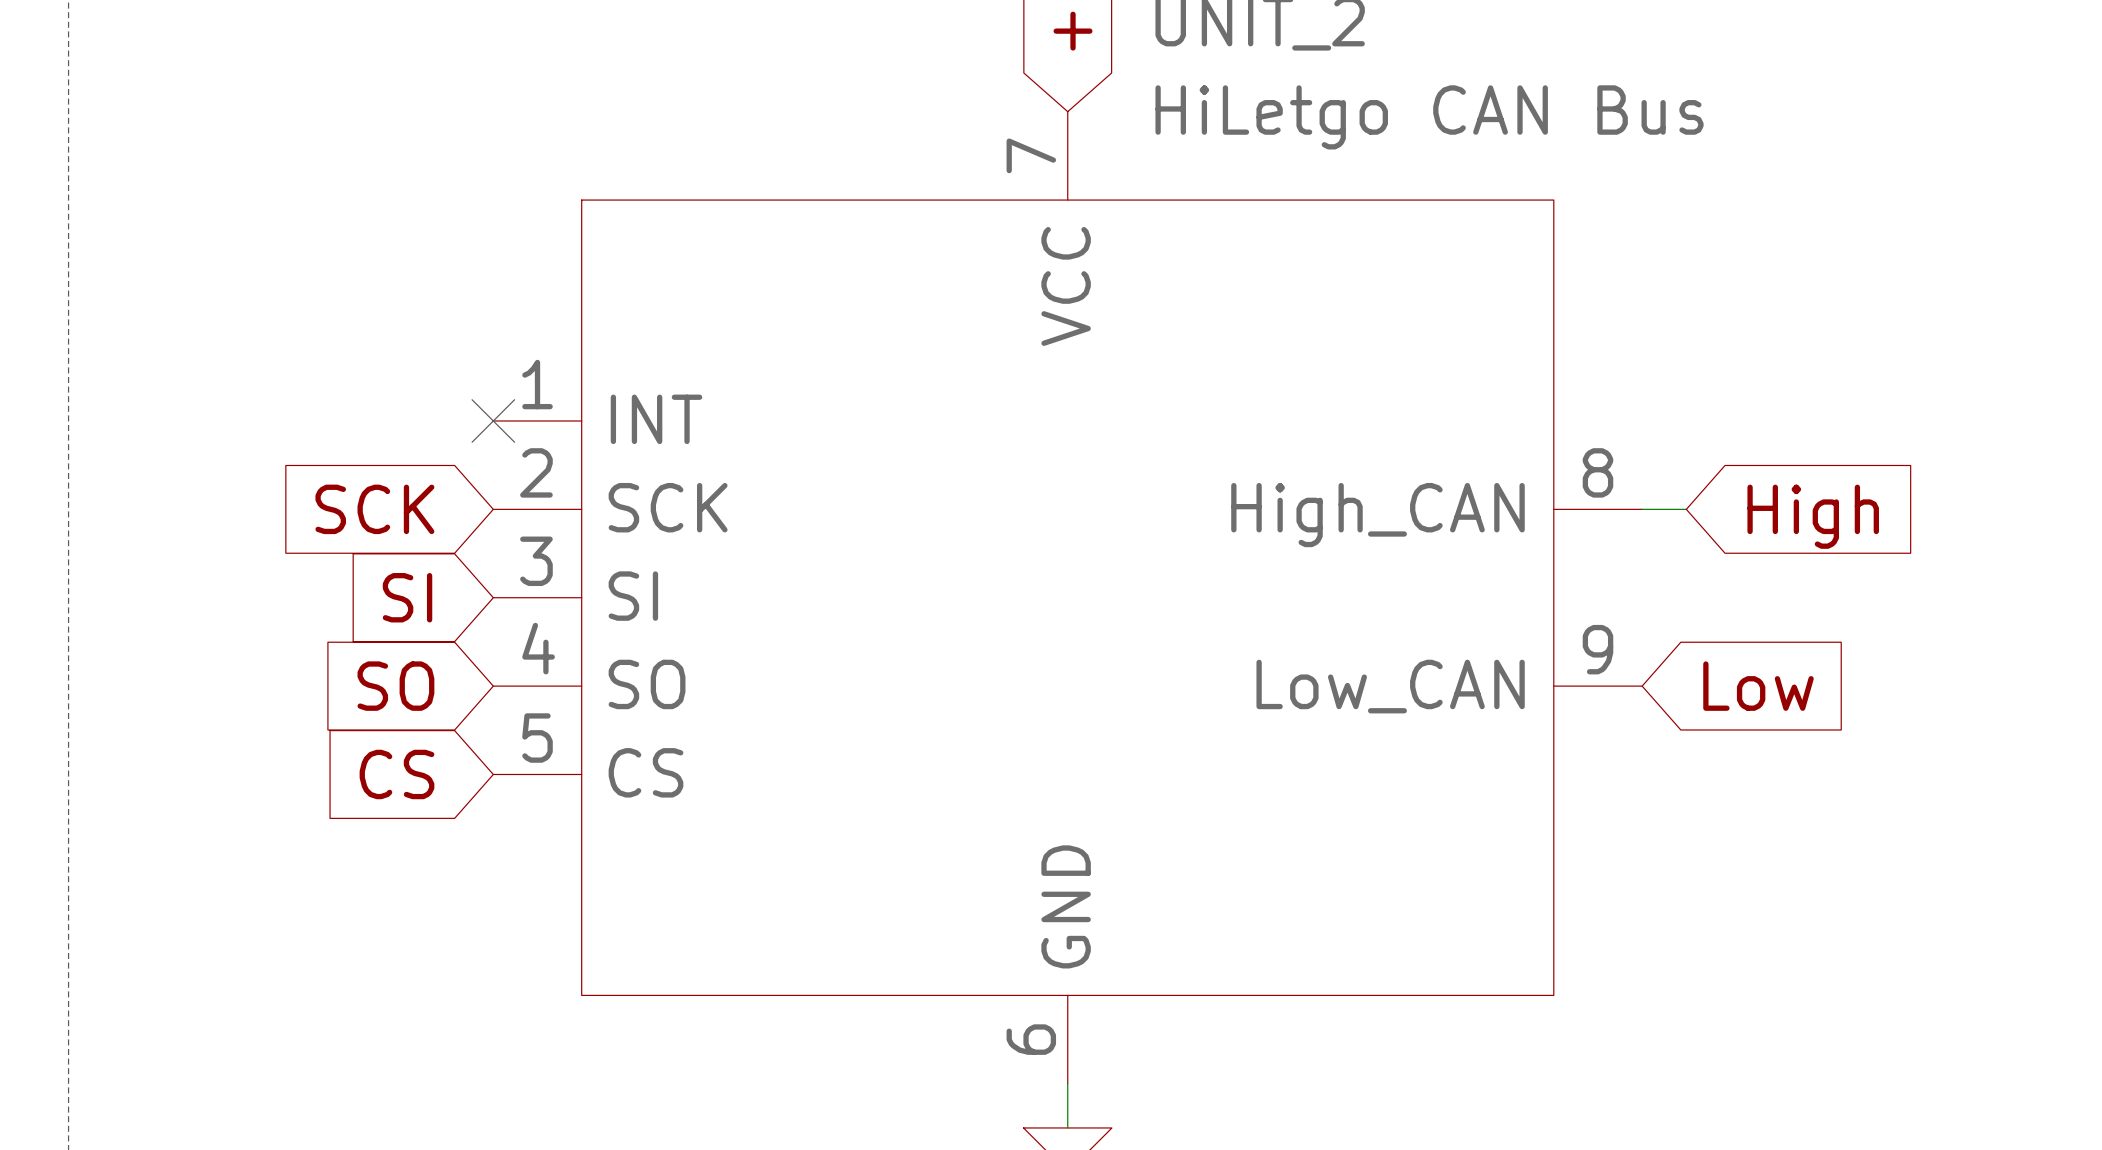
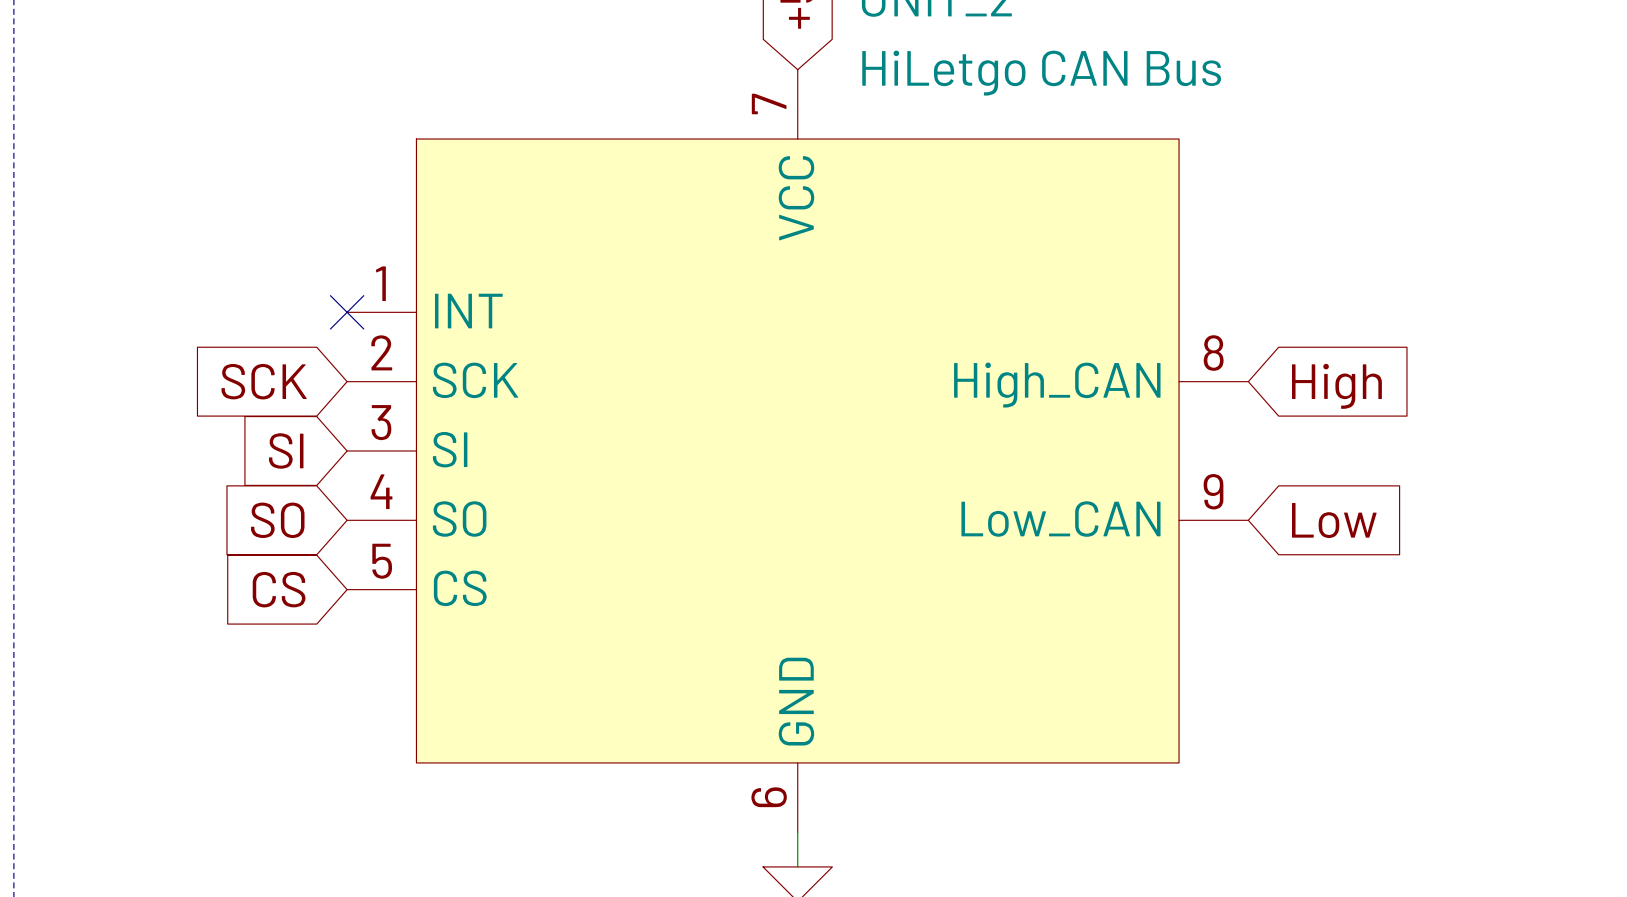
wire: (1642, 509) (1686, 509) -> none
global label position: High (1813, 516) -> High (1336, 386)

